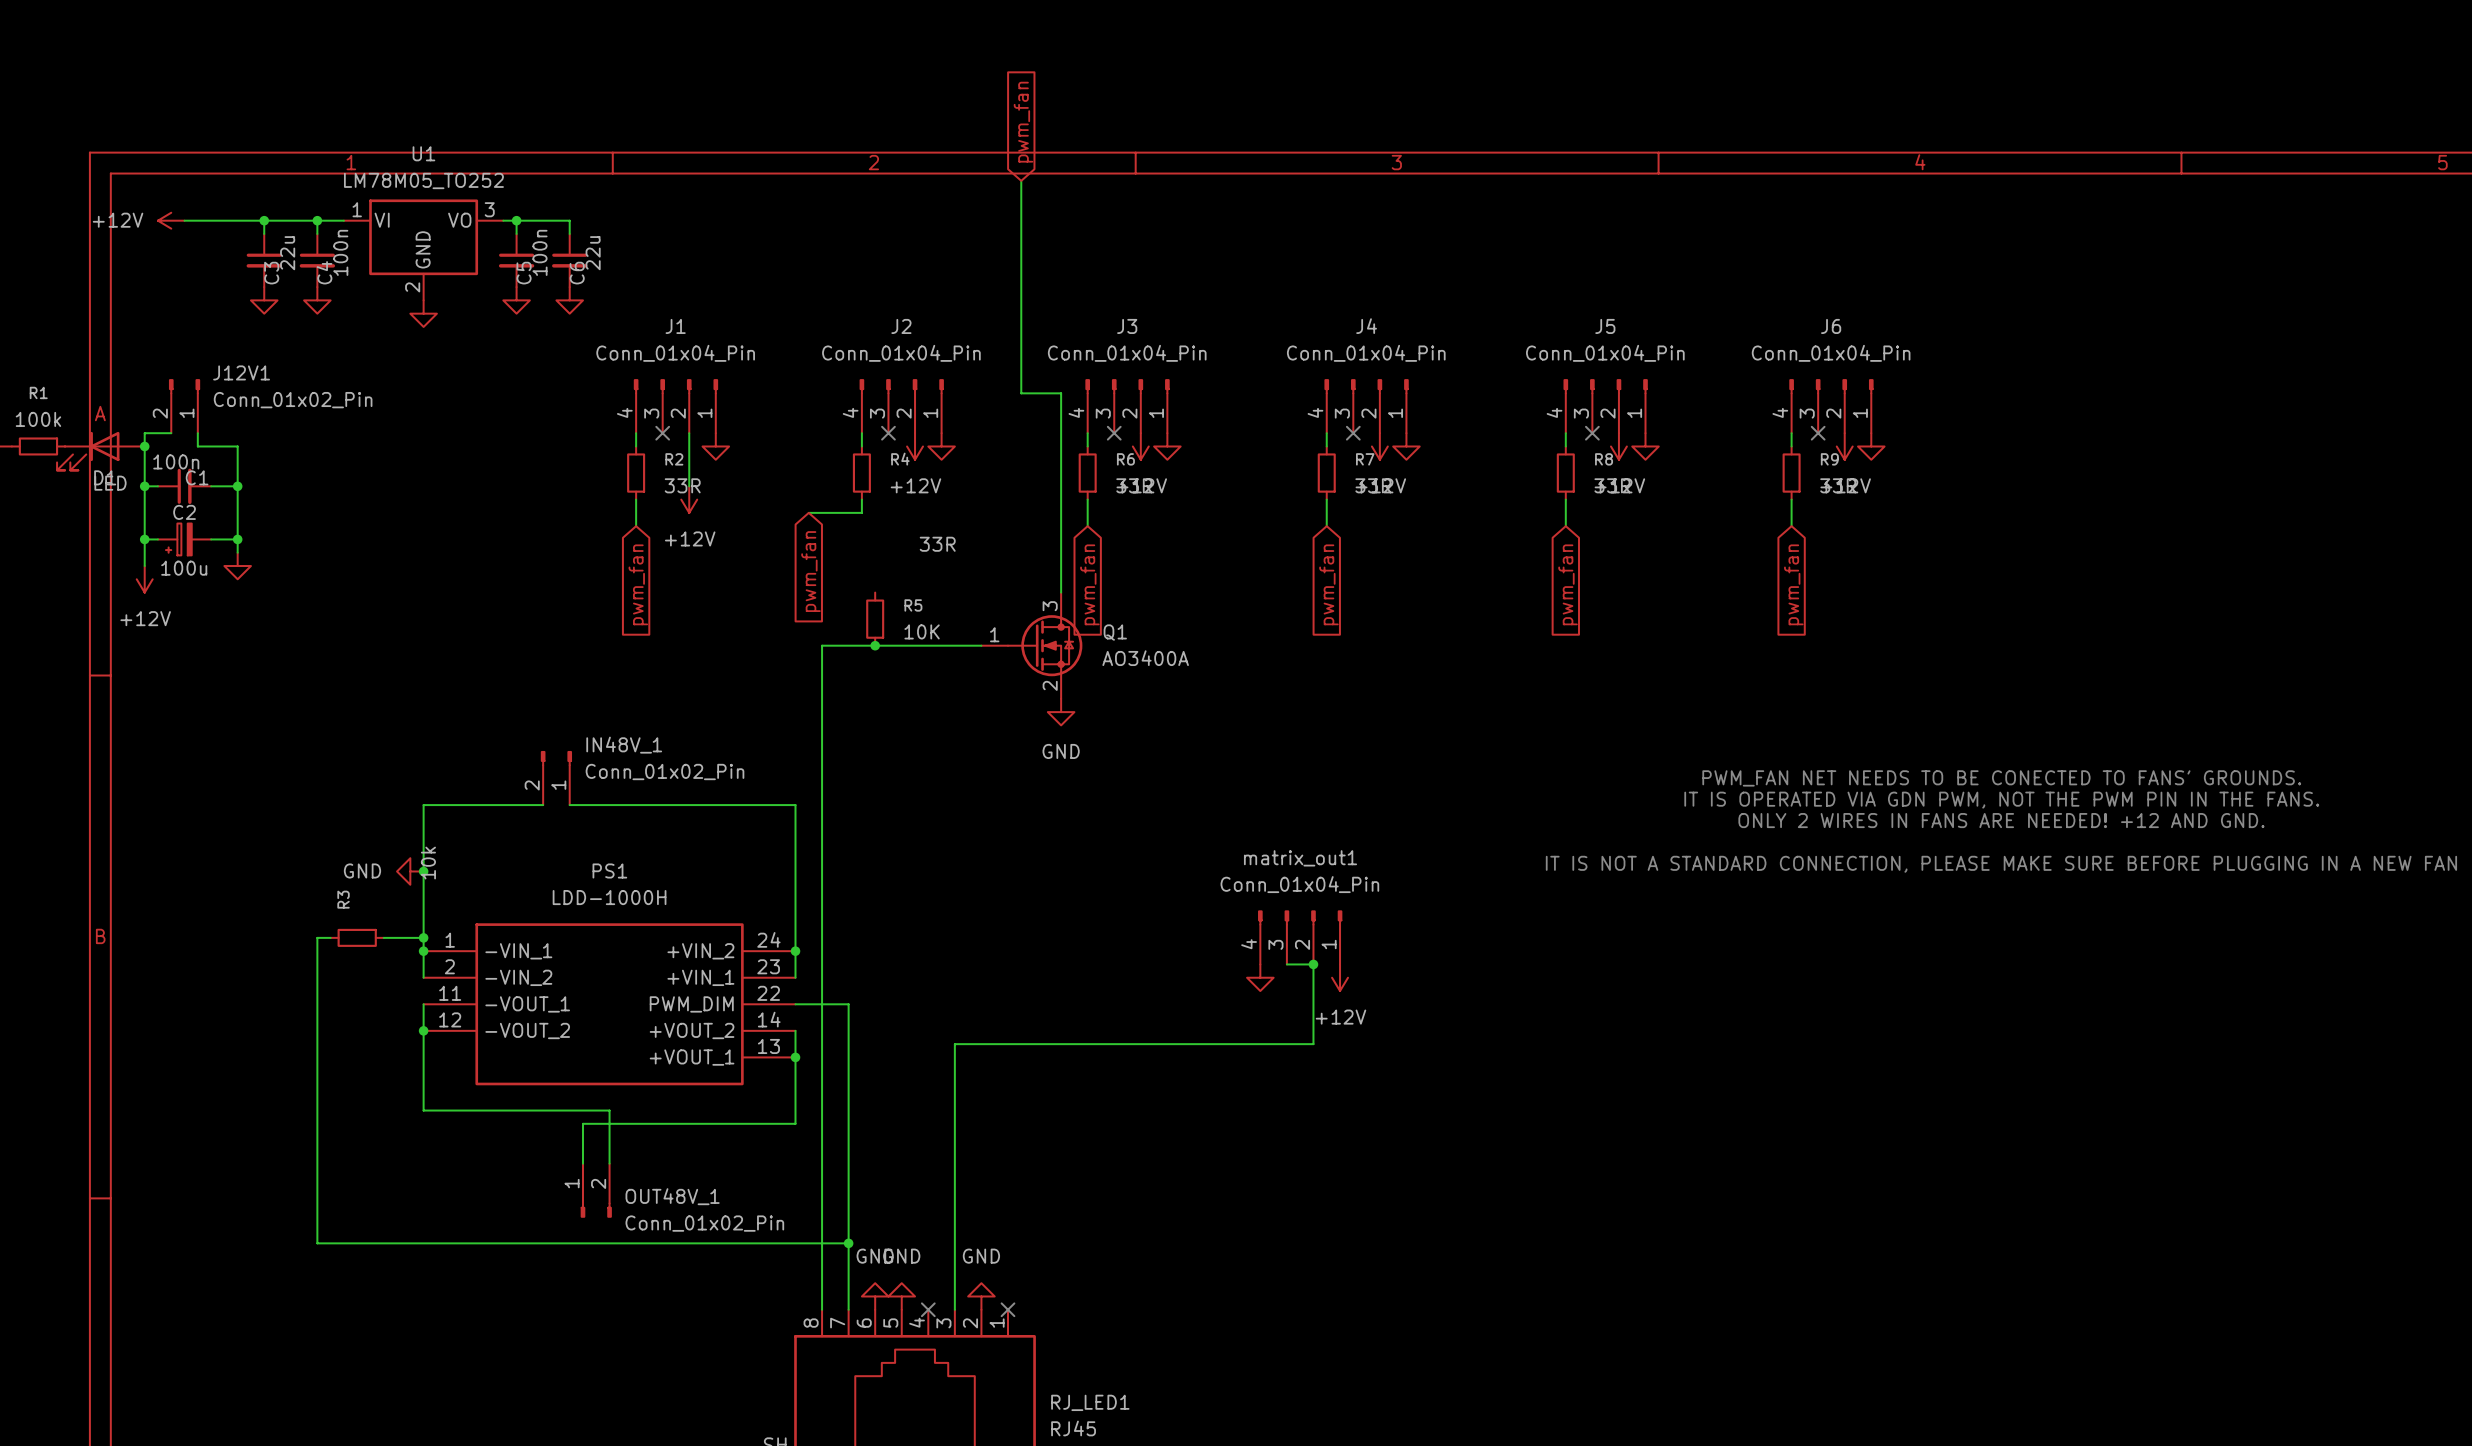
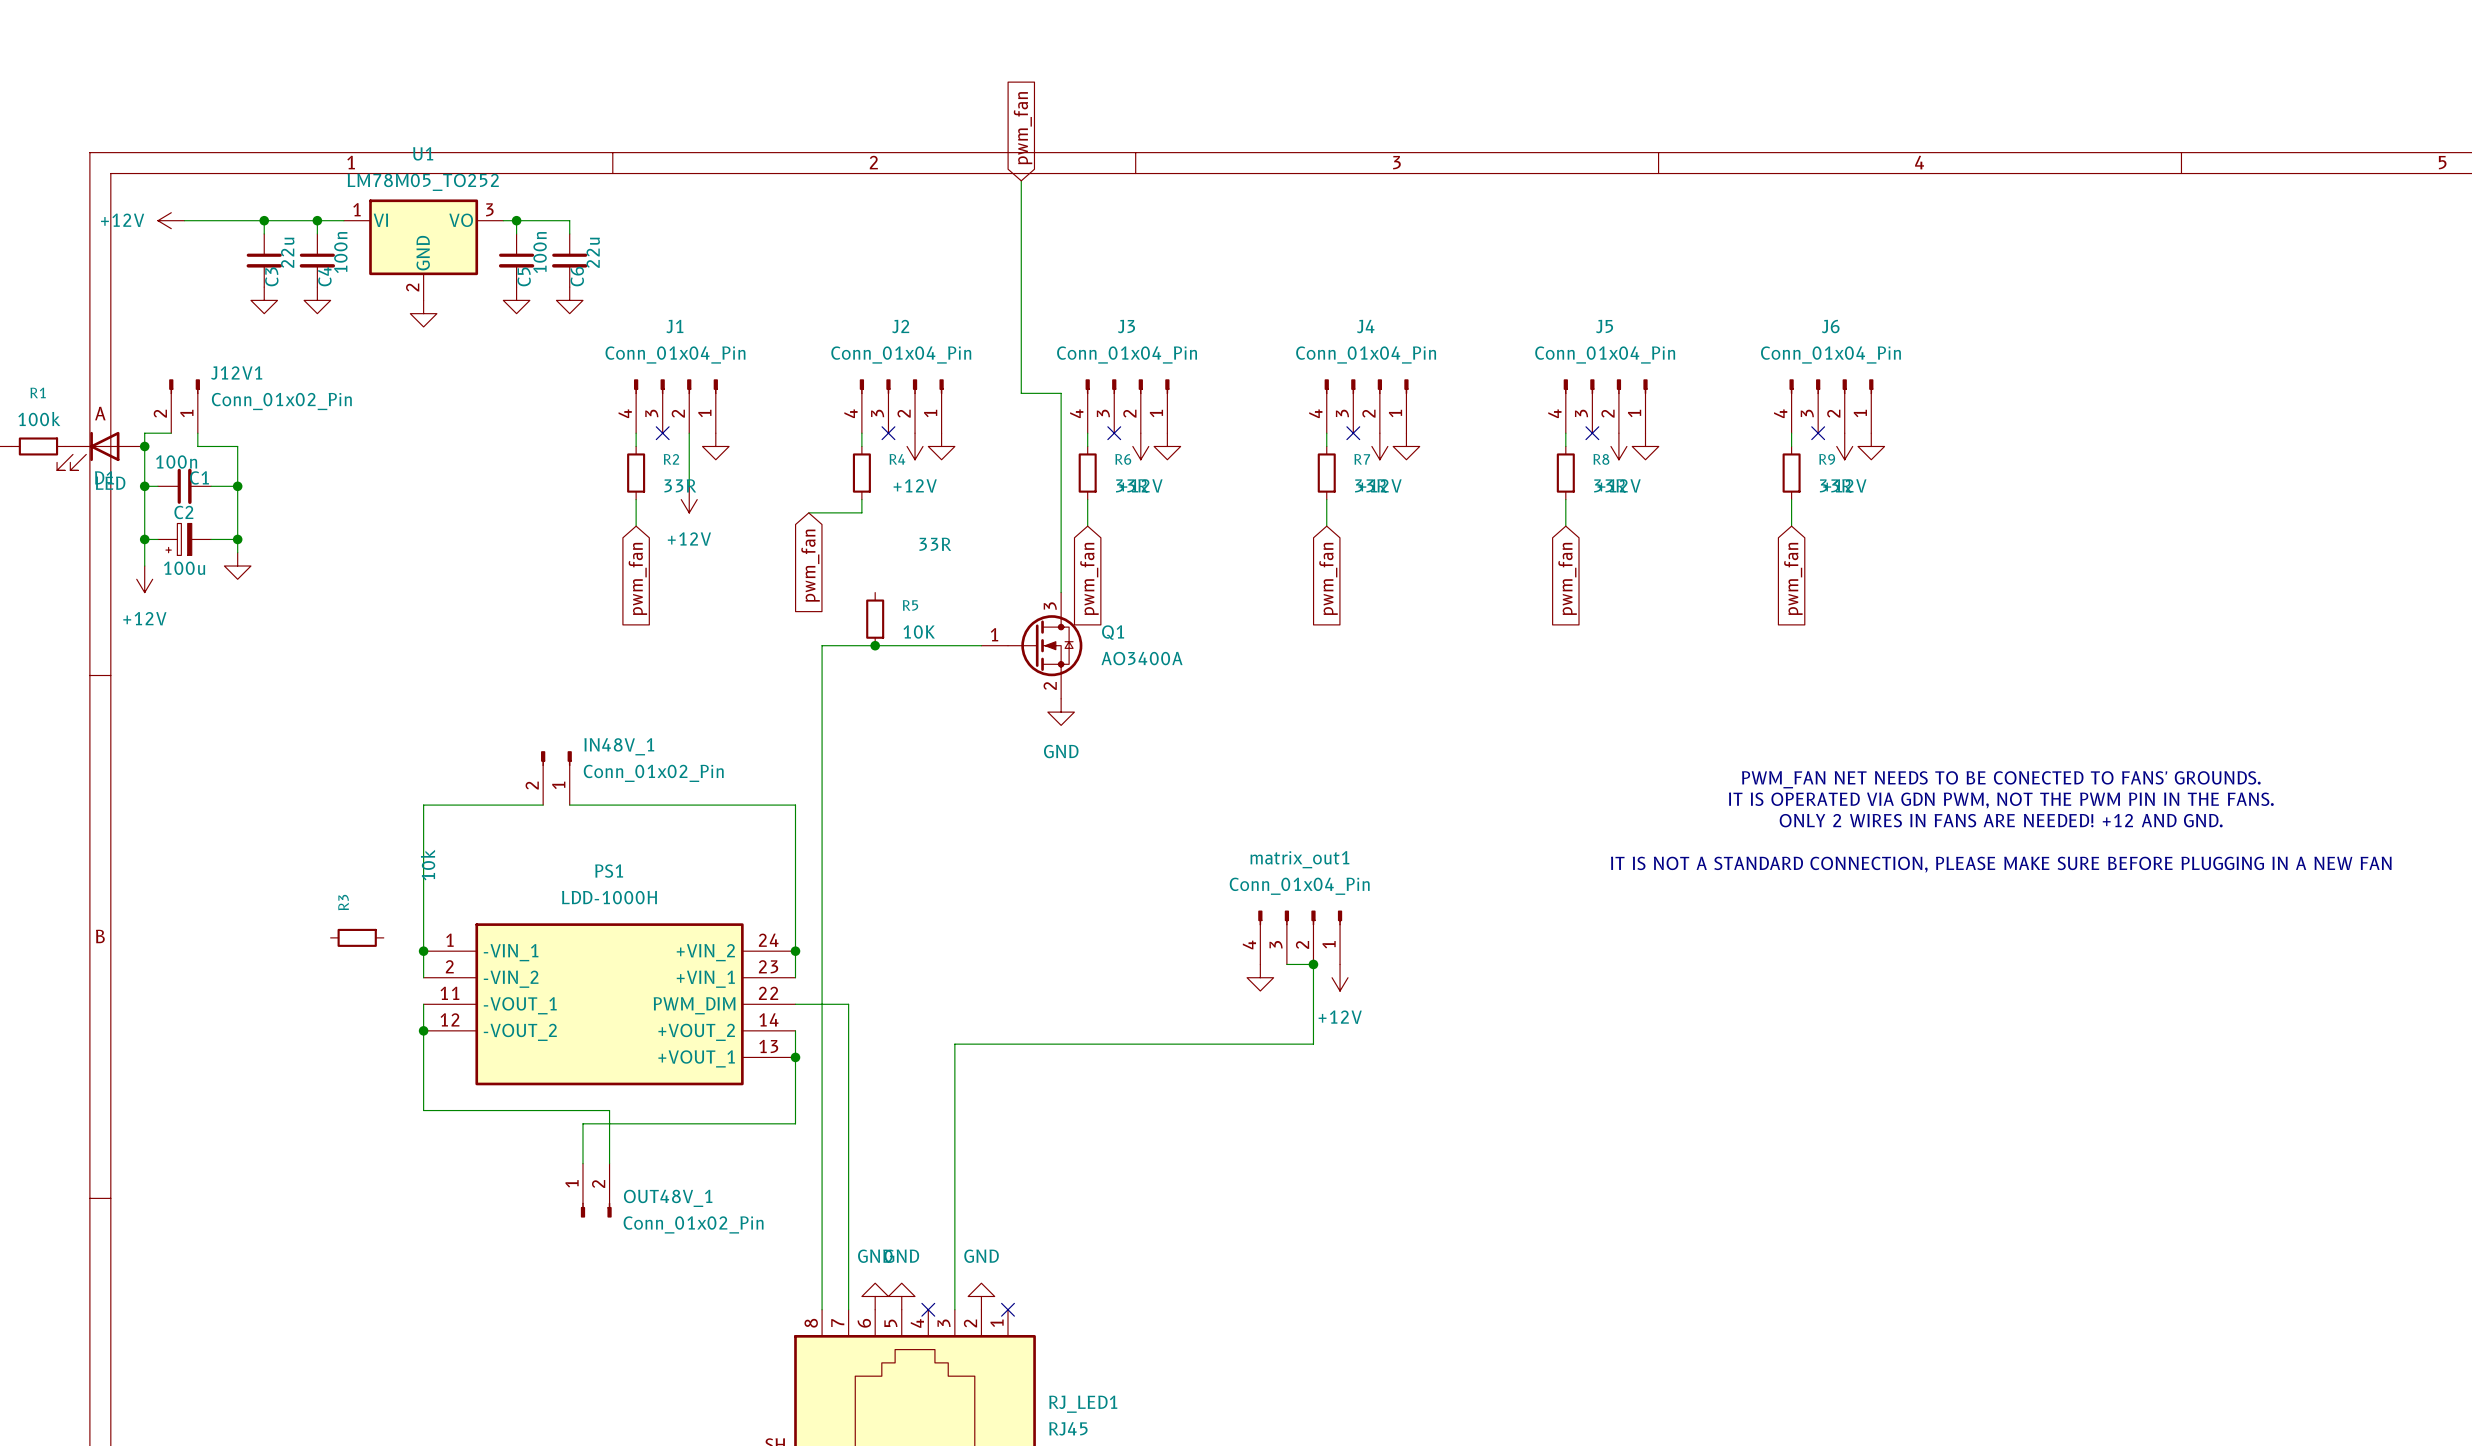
power symbol: GND (410, 871) -> none
junction: (423, 871) -> none
wire: (330, 937) (317, 937) (317, 1243) (848, 1243) -> none
wire: (383, 937) (423, 937) -> none
junction: (423, 937) -> none
junction: (848, 1243) -> none

